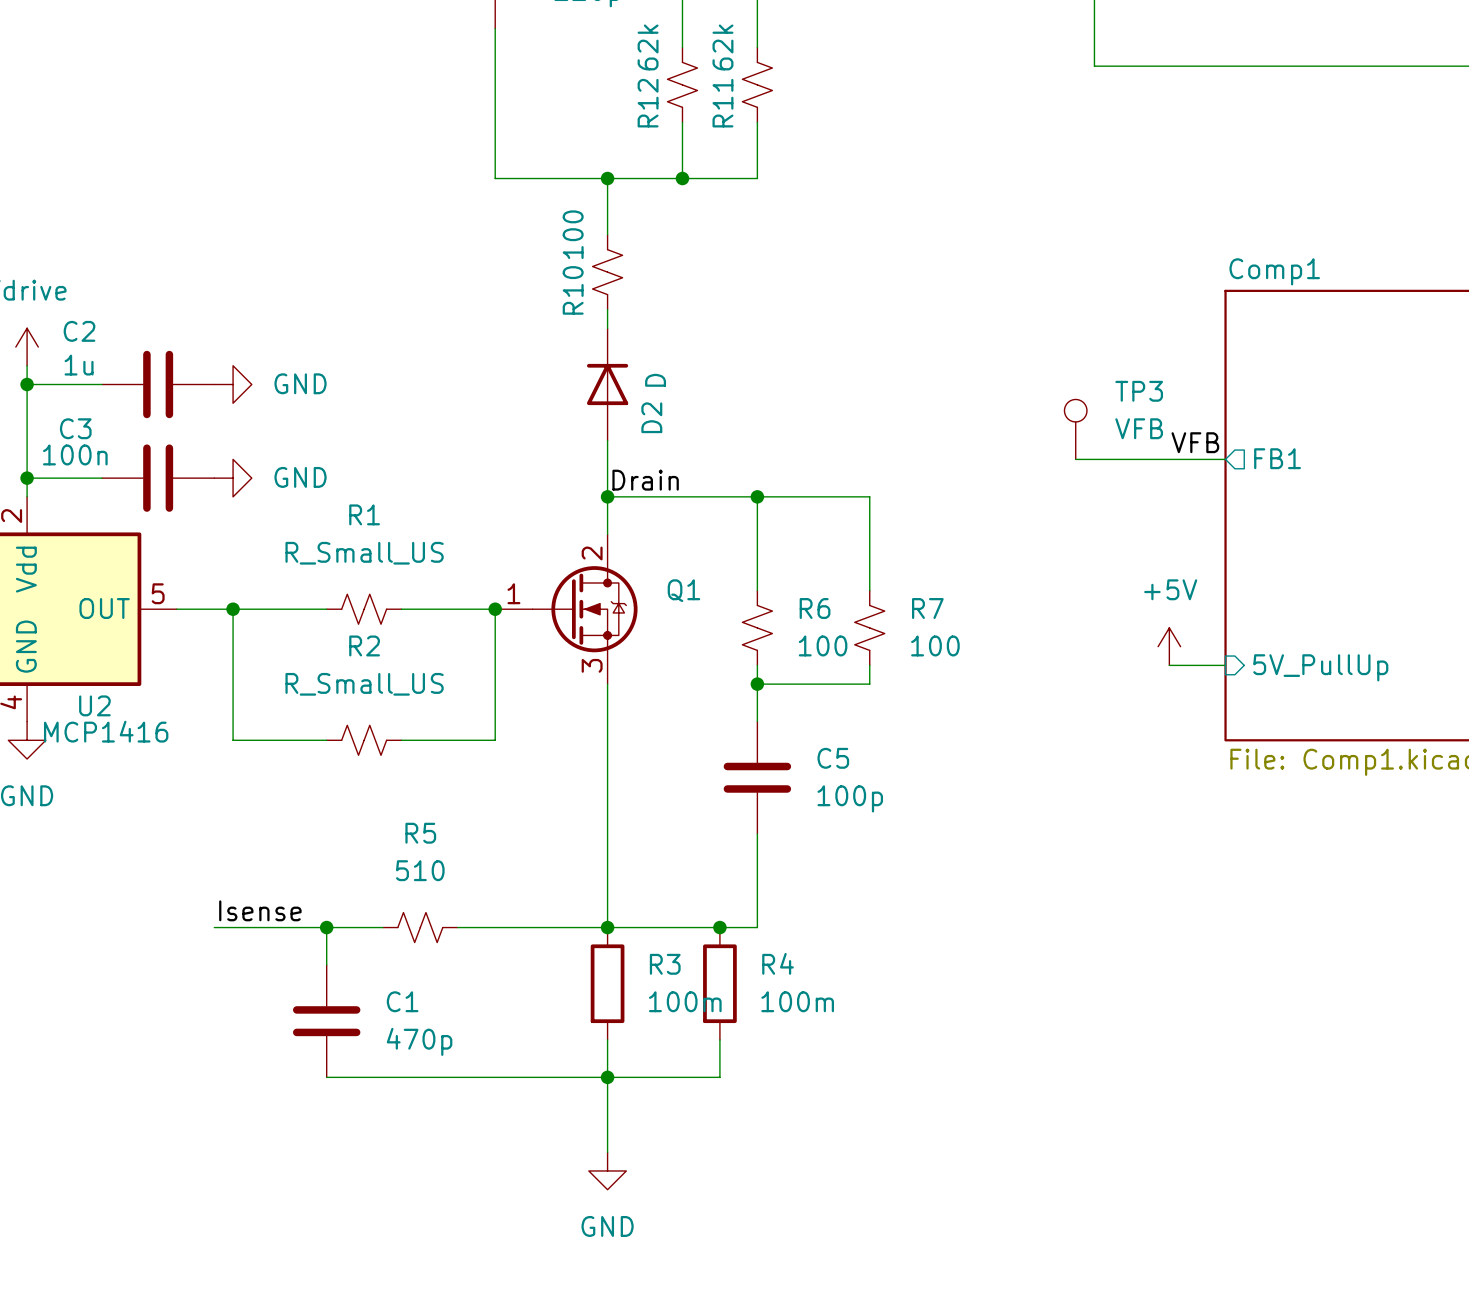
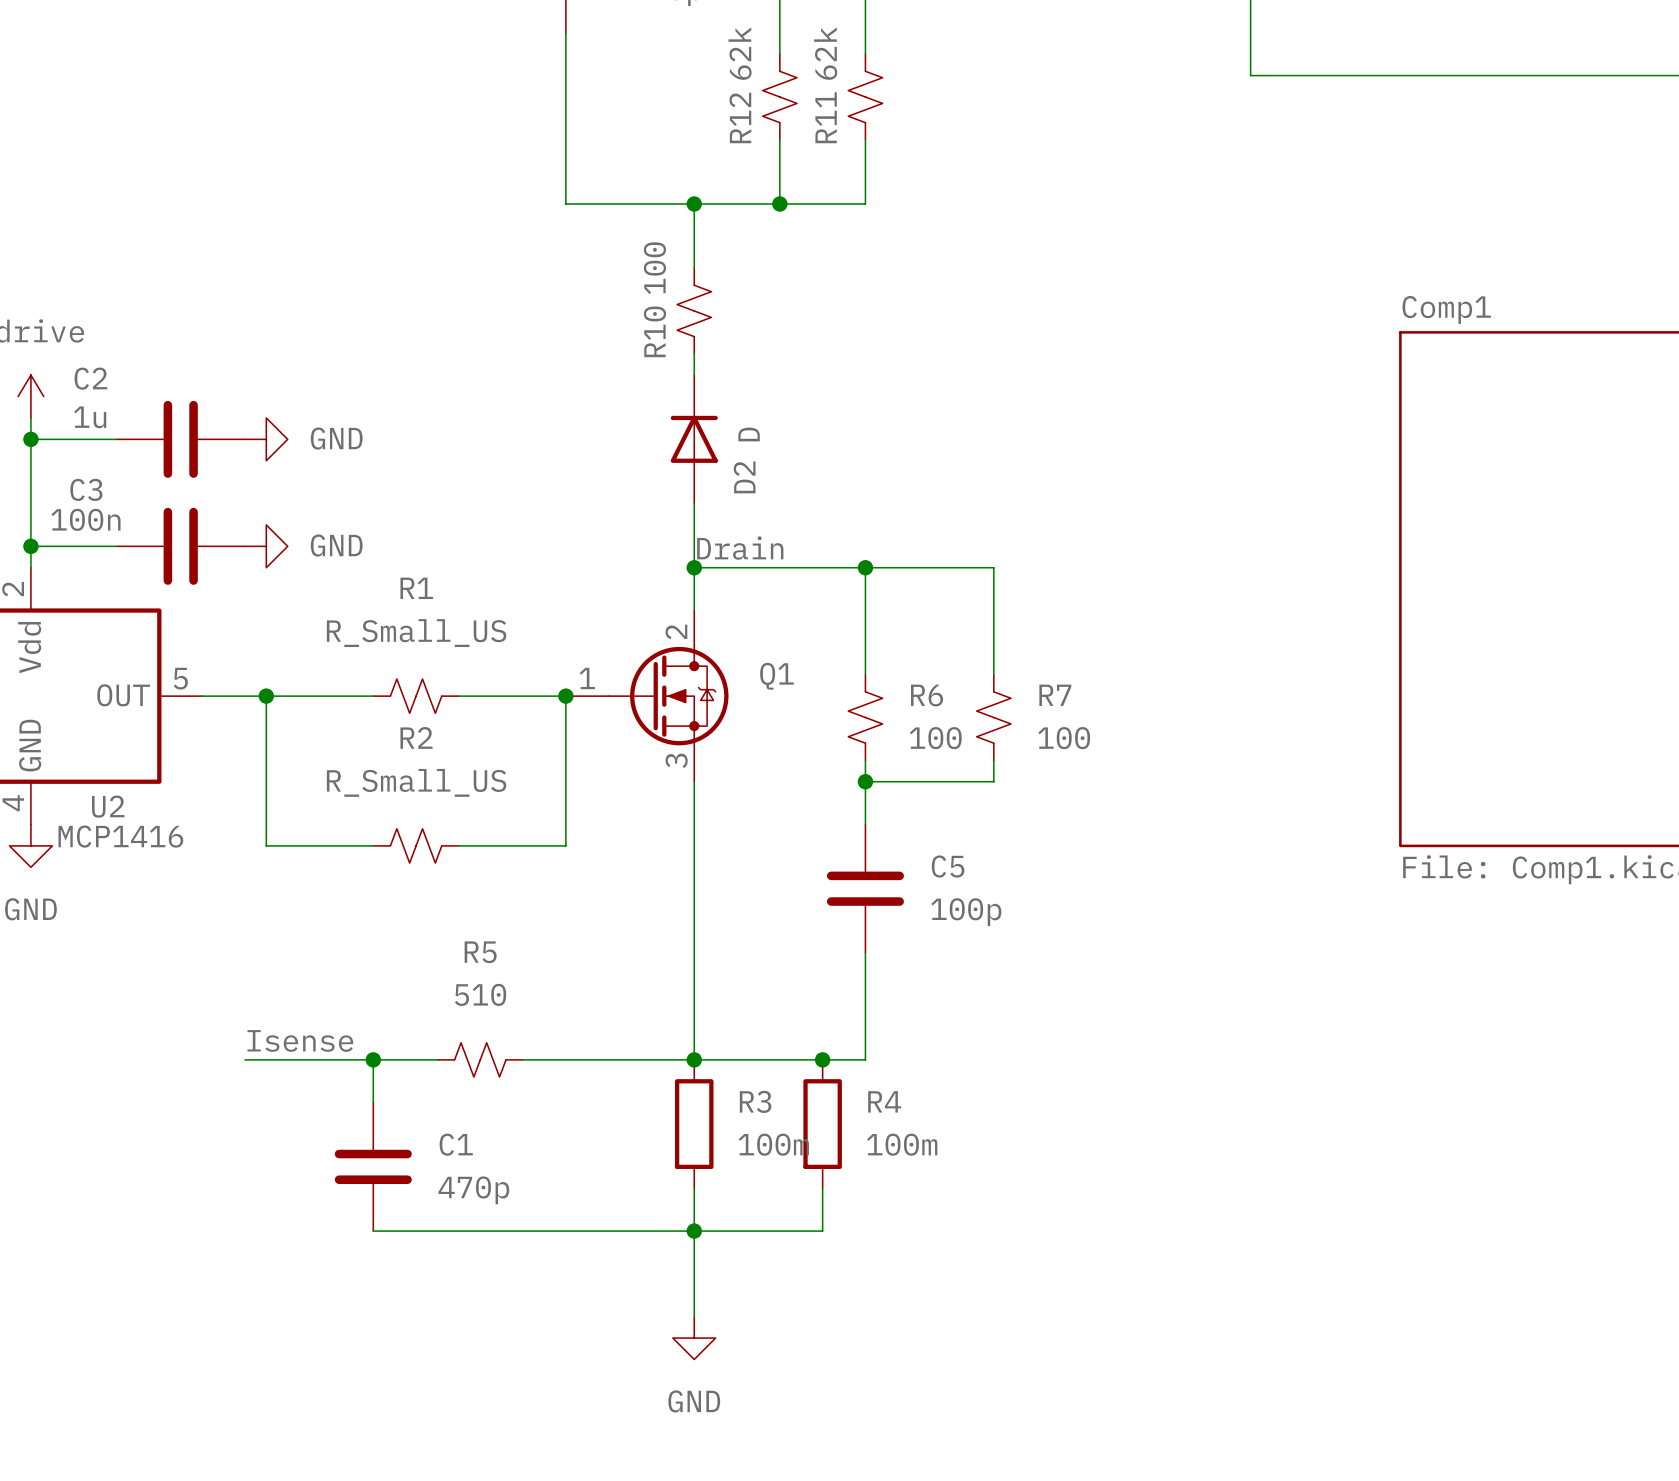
TP3: VFB (1075, 429) -> none
label: VFB (1195, 442) -> none
sheet pin: FB1 (1277, 458) -> none
wire: (1075, 459) (1225, 459) -> none
power symbol: +5V (1169, 646) -> none
wire: (1169, 665) (1225, 665) -> none
sheet pin: 5V_PullUp (1320, 667) -> none

